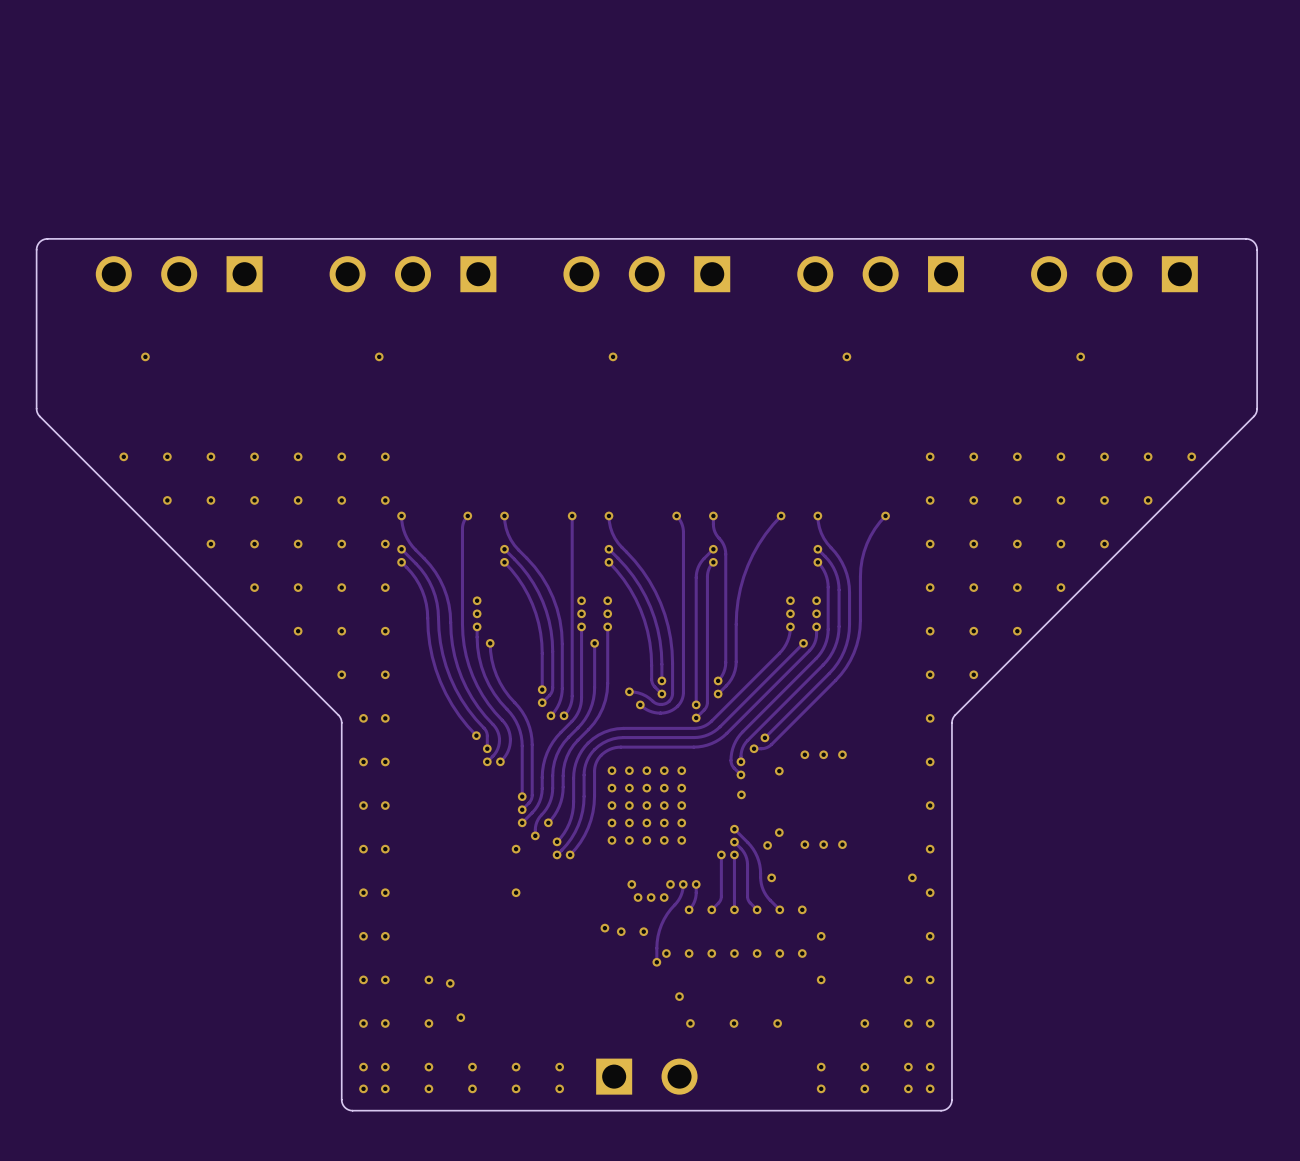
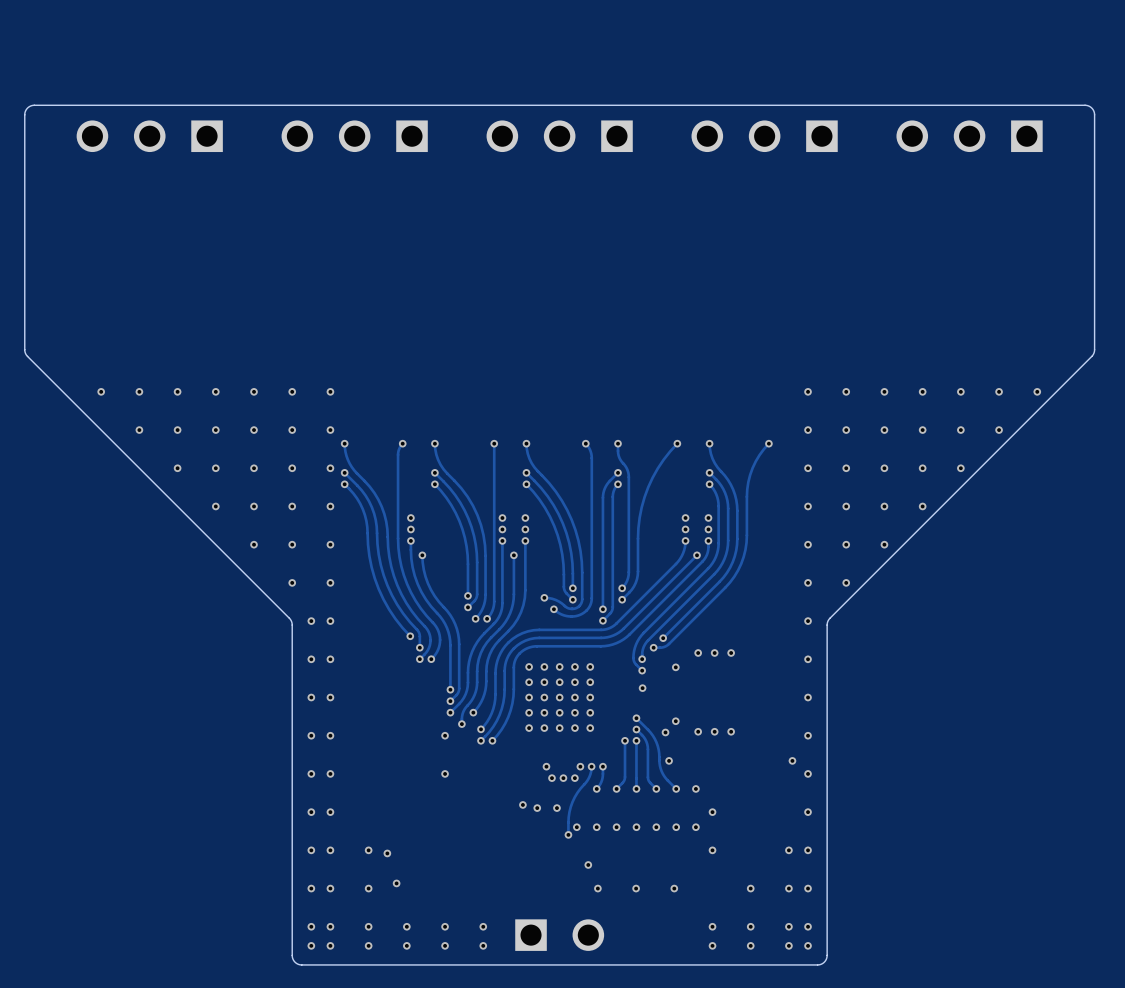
board edge: (1257, 249) (1253, 242) (1246, 238) (47, 238) (39, 242) (36, 249) -> (1094, 210) (1094, 113) (1091, 108) (1085, 105) (33, 105) (27, 108) (24, 113) (24, 210)
part position: (179, 274) -> (149, 136)
part position: (413, 274) -> (354, 136)
part position: (646, 274) -> (559, 136)
part position: (880, 274) -> (764, 136)
part position: (1114, 274) -> (969, 136)
via: (145, 356) -> none
via: (379, 356) -> none
via: (613, 356) -> none
via: (846, 356) -> none
via: (1080, 356) -> none

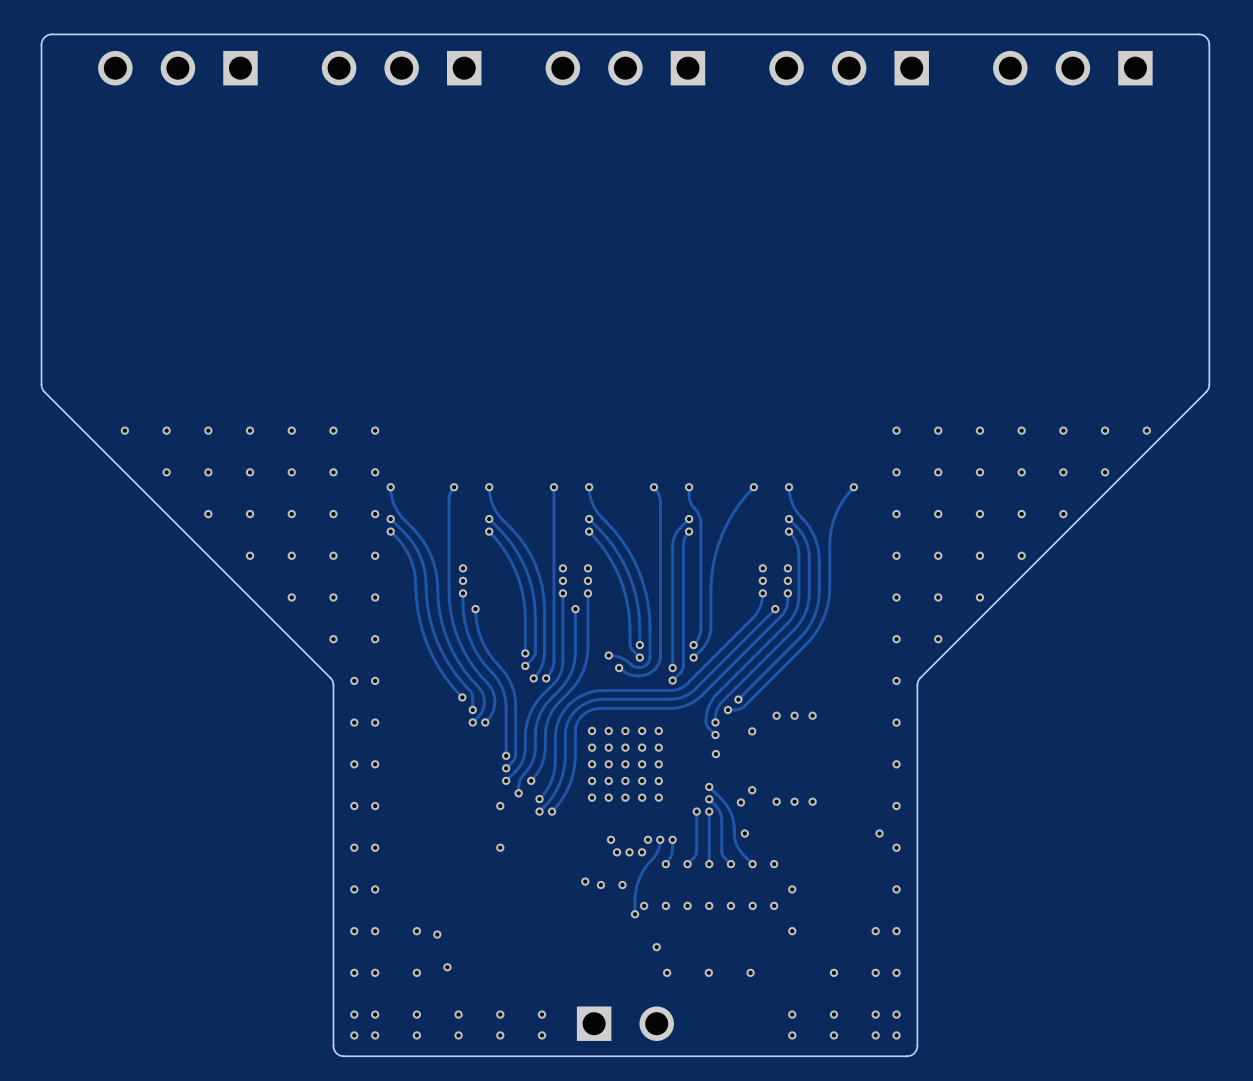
board edge: (1094, 114) (1091, 108) (1085, 105) (34, 105) (27, 108) (24, 114) -> (1209, 128) (1209, 43) (1205, 36) (1198, 34) (50, 34) (44, 37) (41, 43) (41, 128)
part position: (149, 136) -> (177, 68)
part position: (354, 136) -> (401, 68)
part position: (559, 136) -> (625, 68)
part position: (764, 136) -> (849, 68)
part position: (969, 136) -> (1072, 68)

